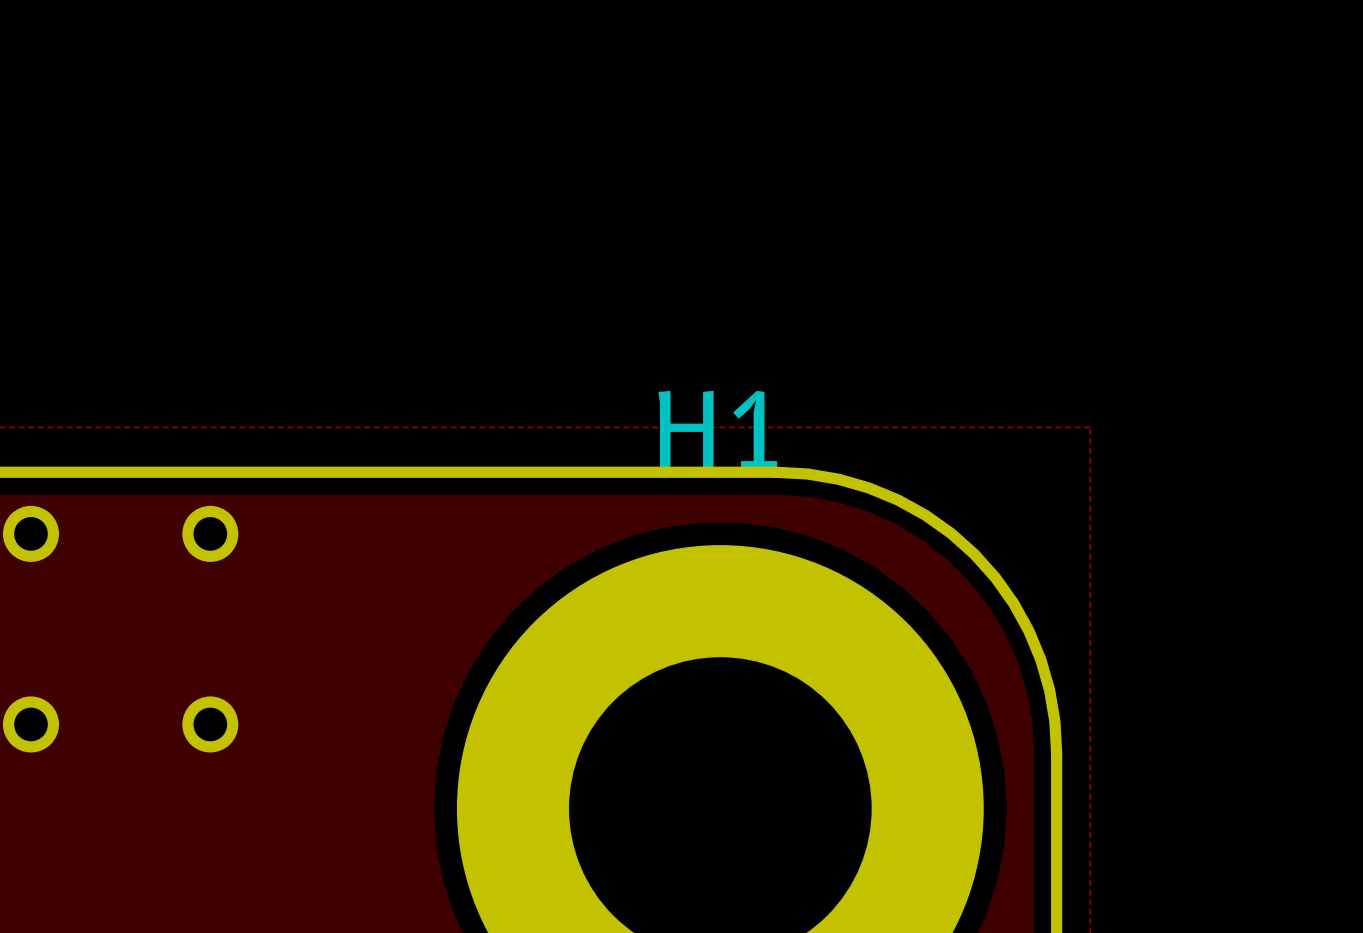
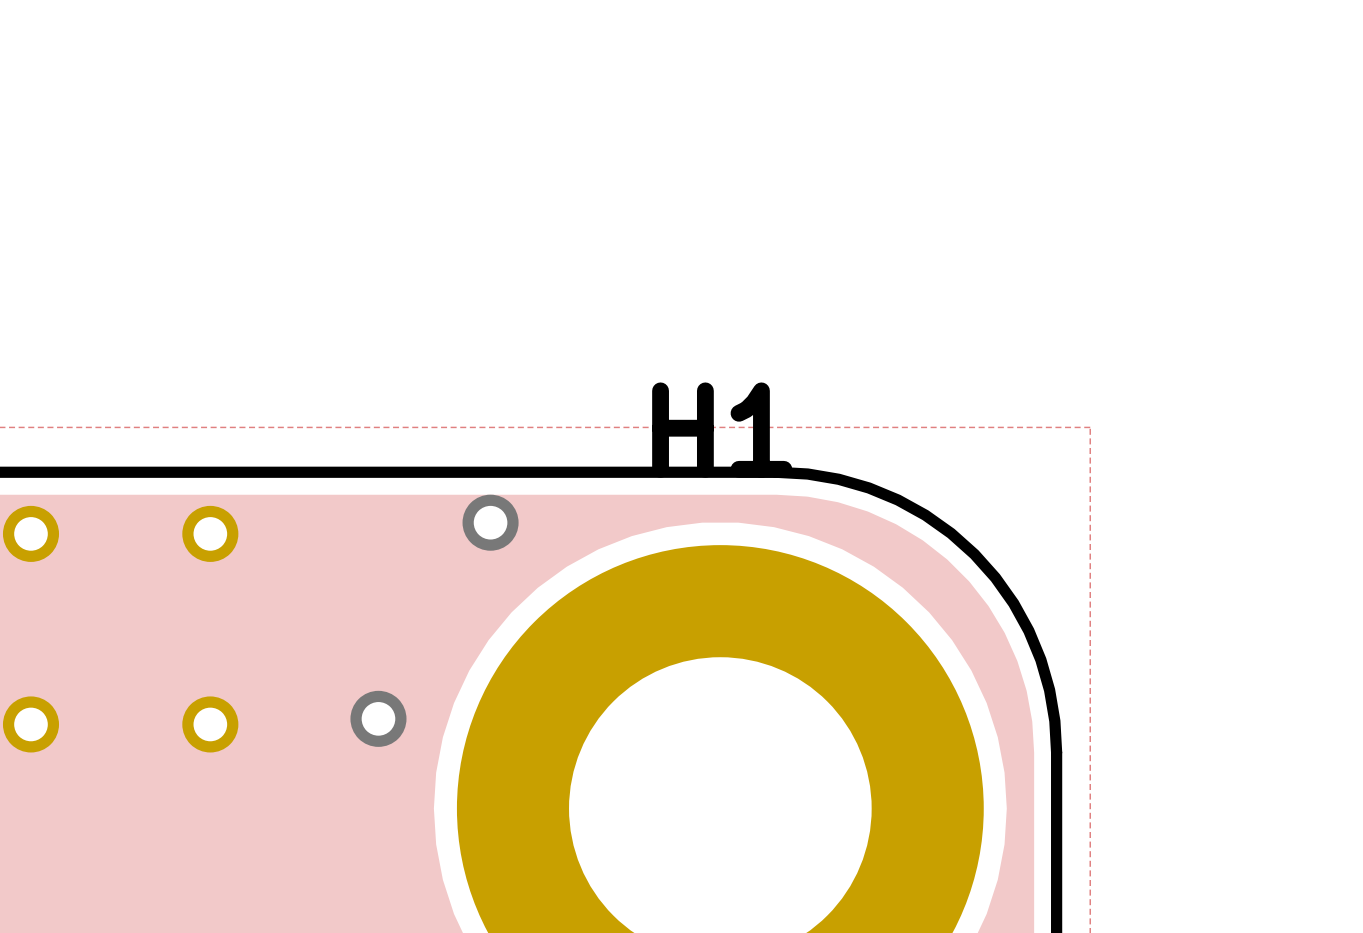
via: none -> (490, 522)
via: none -> (378, 718)

